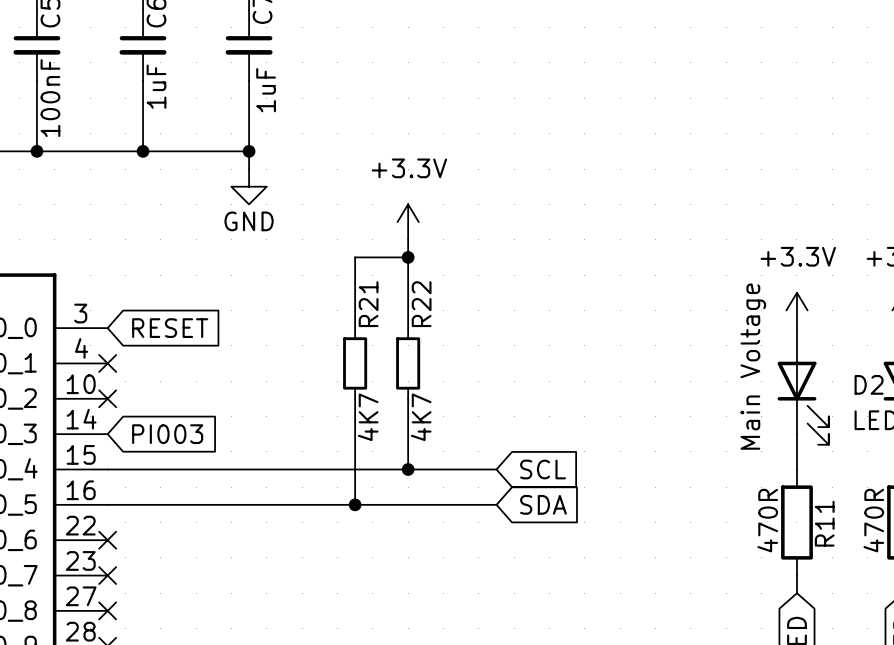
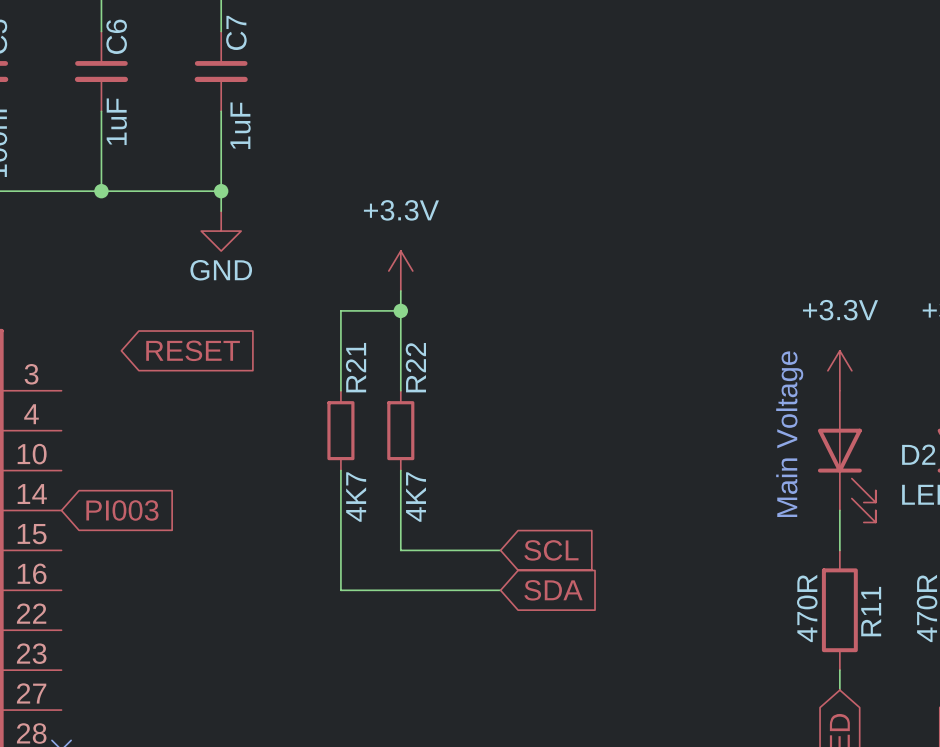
global label position: RESET (170, 328) -> RESET (193, 350)
no-connect mark: (107, 363) -> none
no-connect mark: (107, 398) -> none
wire: (107, 469) (408, 469) -> none
junction: (408, 469) -> none
wire: (107, 504) (355, 504) -> none
junction: (355, 504) -> none
no-connect mark: (107, 540) -> none
no-connect mark: (107, 575) -> none
no-connect mark: (107, 610) -> none

